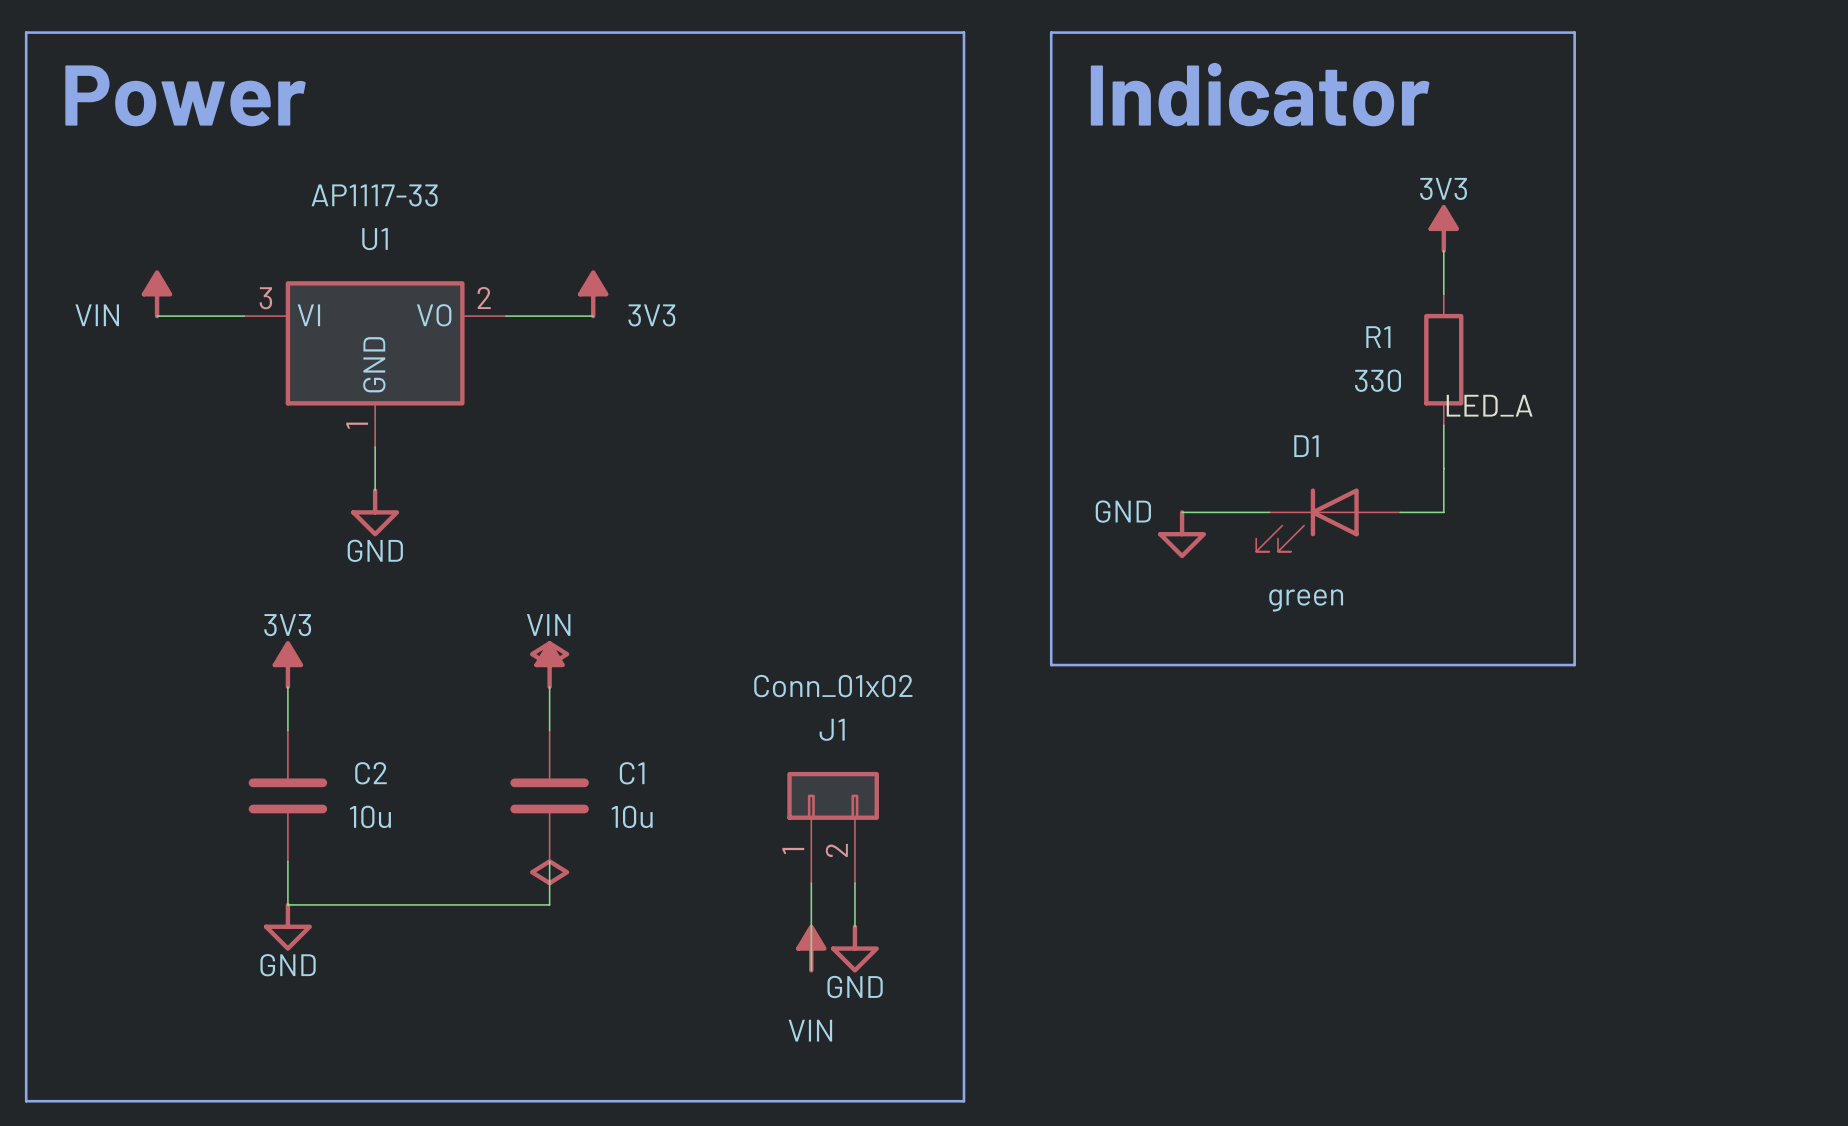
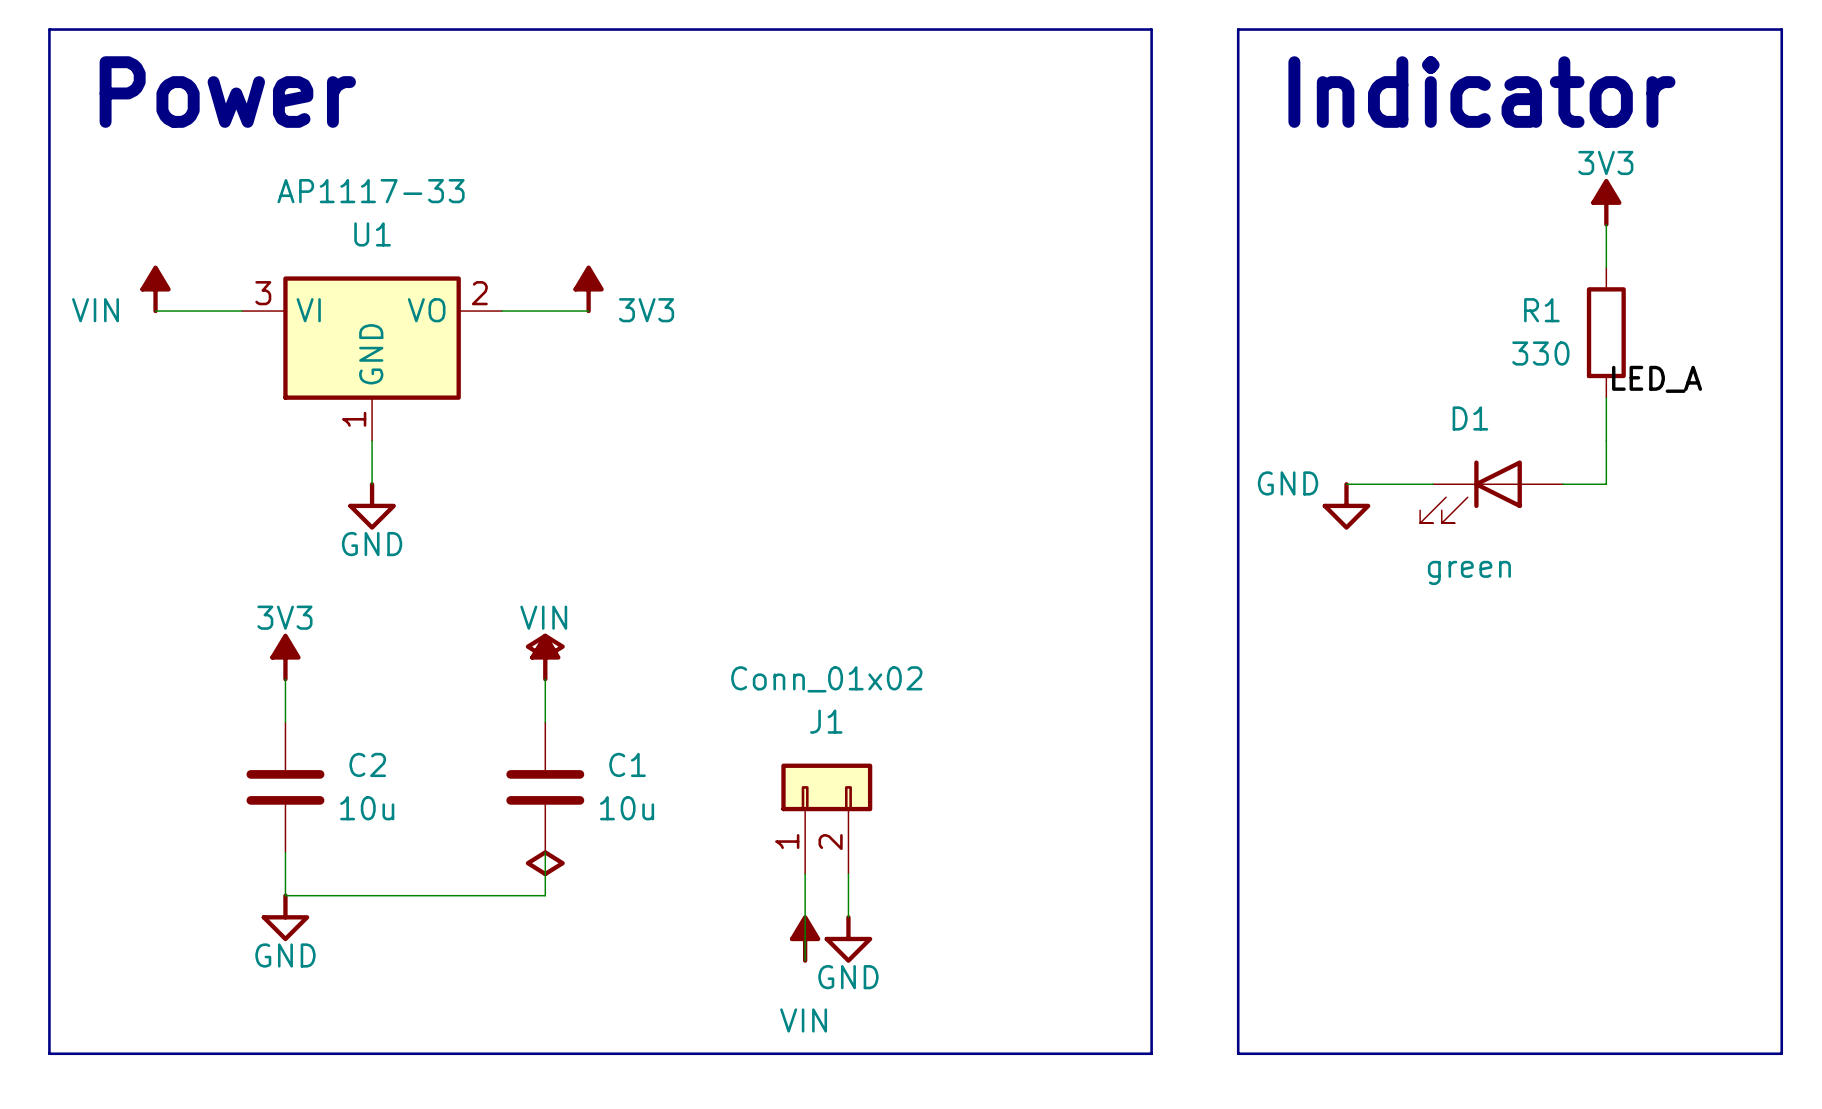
line: (50, 32) (26, 32) (26, 1101) (963, 1101) (963, 32) -> (49, 29) (49, 1053) (1151, 1053) (1151, 29)
line: (1051, 32) (1051, 665) (1574, 665) (1574, 32) -> (1238, 29) (1238, 1053) (1781, 1053) (1781, 29) (1563, 29)
line: (1160, 32) (1247, 32) -> (956, 29) (1043, 29)
text position: Indicator (1260, 94) -> Indicator (1481, 92)
text position: Power (185, 95) -> Power (227, 92)
power symbol position: 3V3 (1443, 228) -> 3V3 (1606, 202)
wire: (1443, 250) (1443, 294) -> (1606, 224) (1606, 267)
R1 position: (1443, 359) -> (1606, 332)
label position: LED_A (1489, 405) -> LED_A (1657, 379)
wire: (1443, 425) (1443, 512) (1400, 512) -> (1606, 397) (1606, 484) (1563, 484)
wire: (1182, 512) (1269, 512) -> (1346, 484) (1433, 484)
D1 position: (1328, 520) -> (1491, 491)
power symbol position: GND (1182, 534) -> GND (1346, 505)

